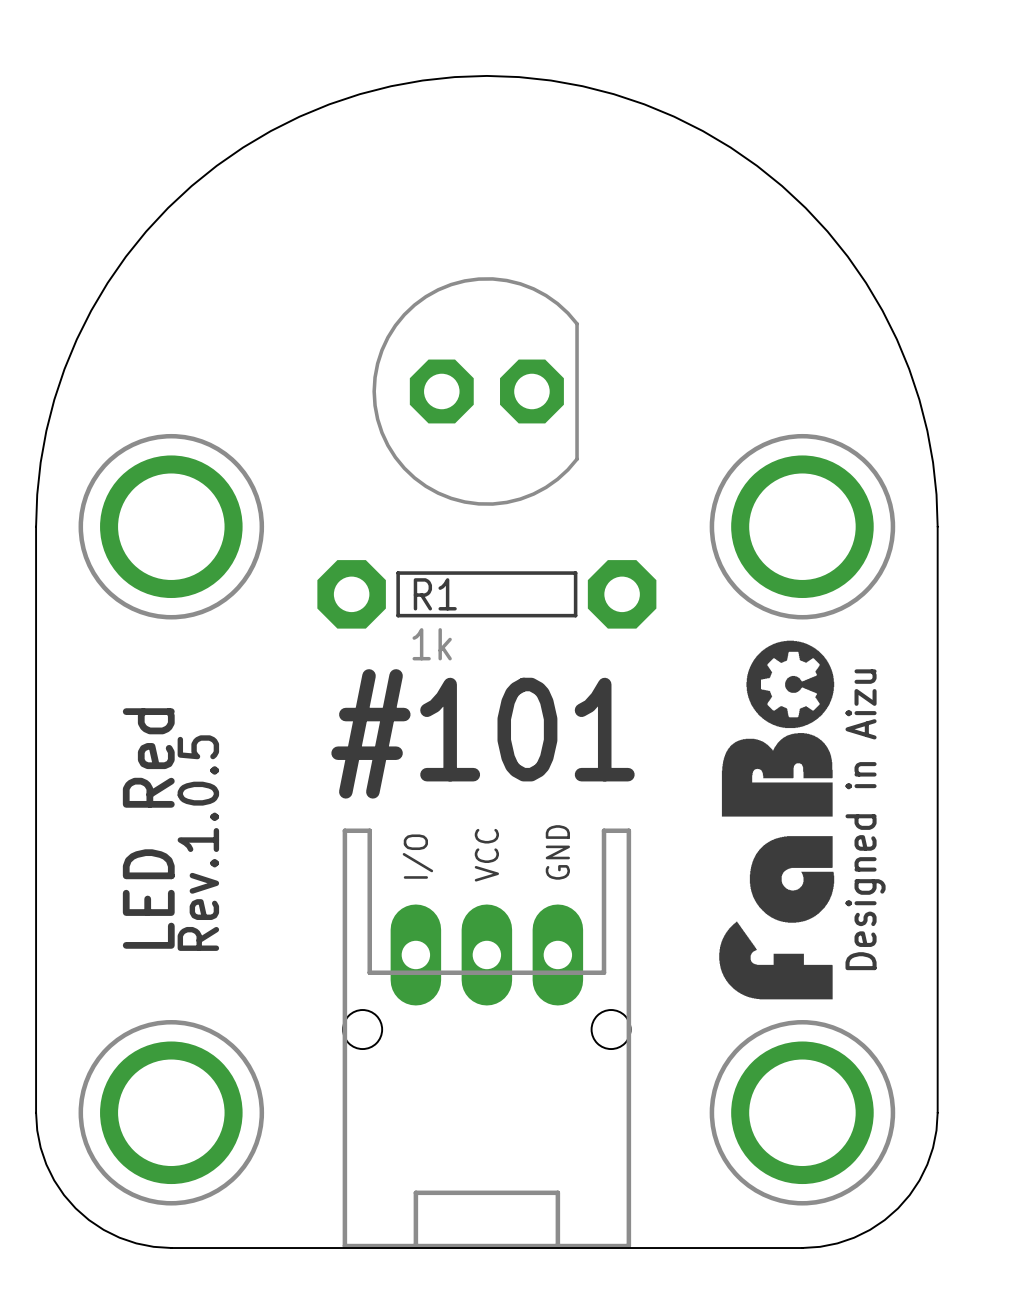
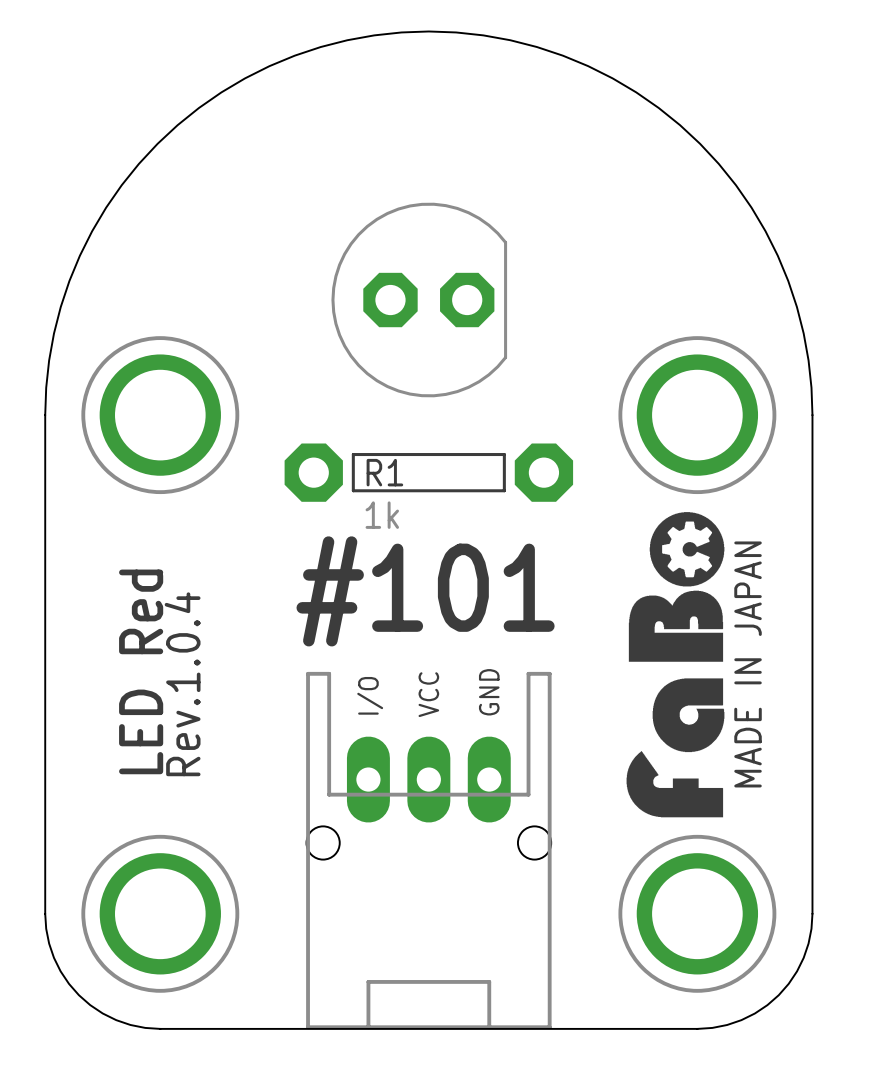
text: Designed in Aizu (865, 819) -> MADE IN JAPAN (748, 664)
text: Rev.1.0.5 (198, 843) -> Rev.1.0.4 (182, 684)

